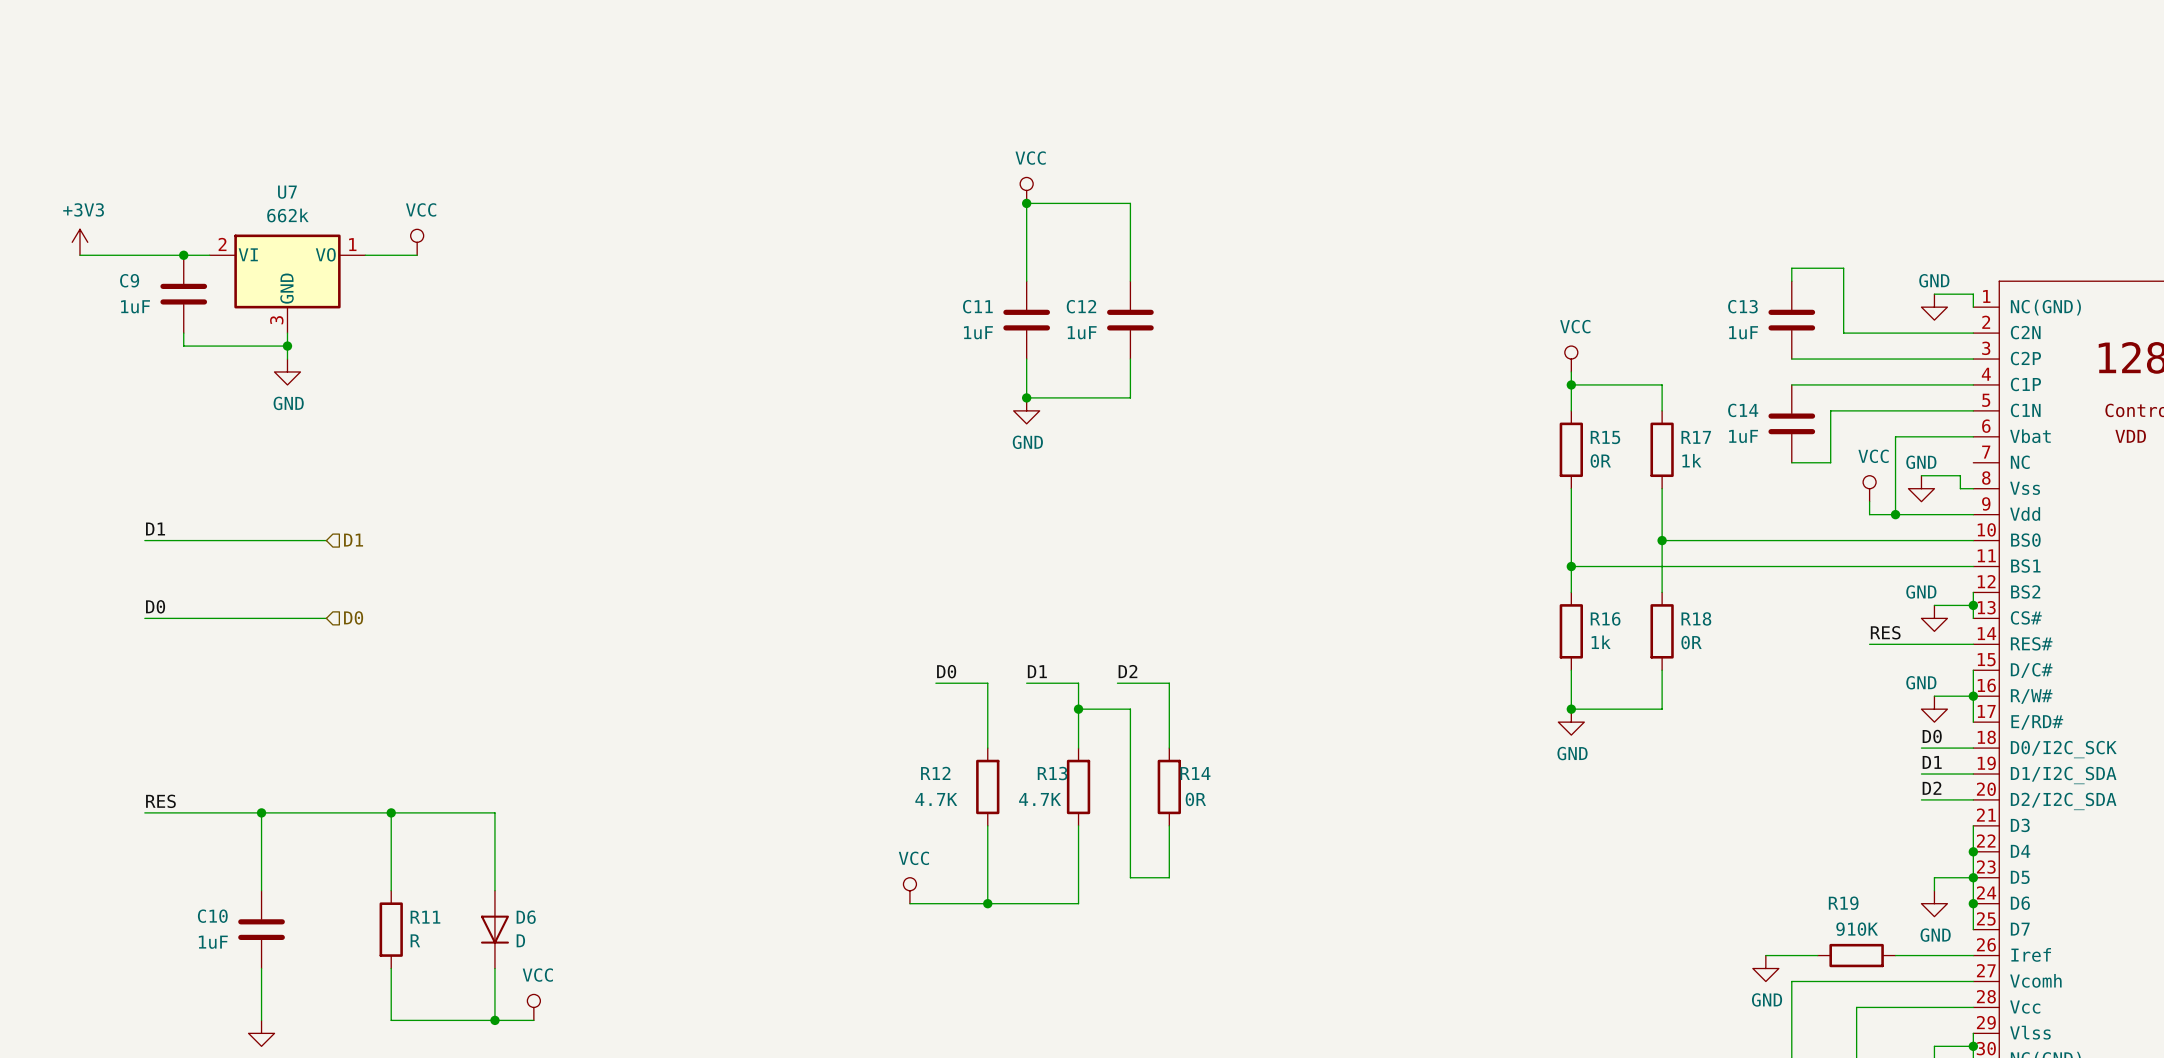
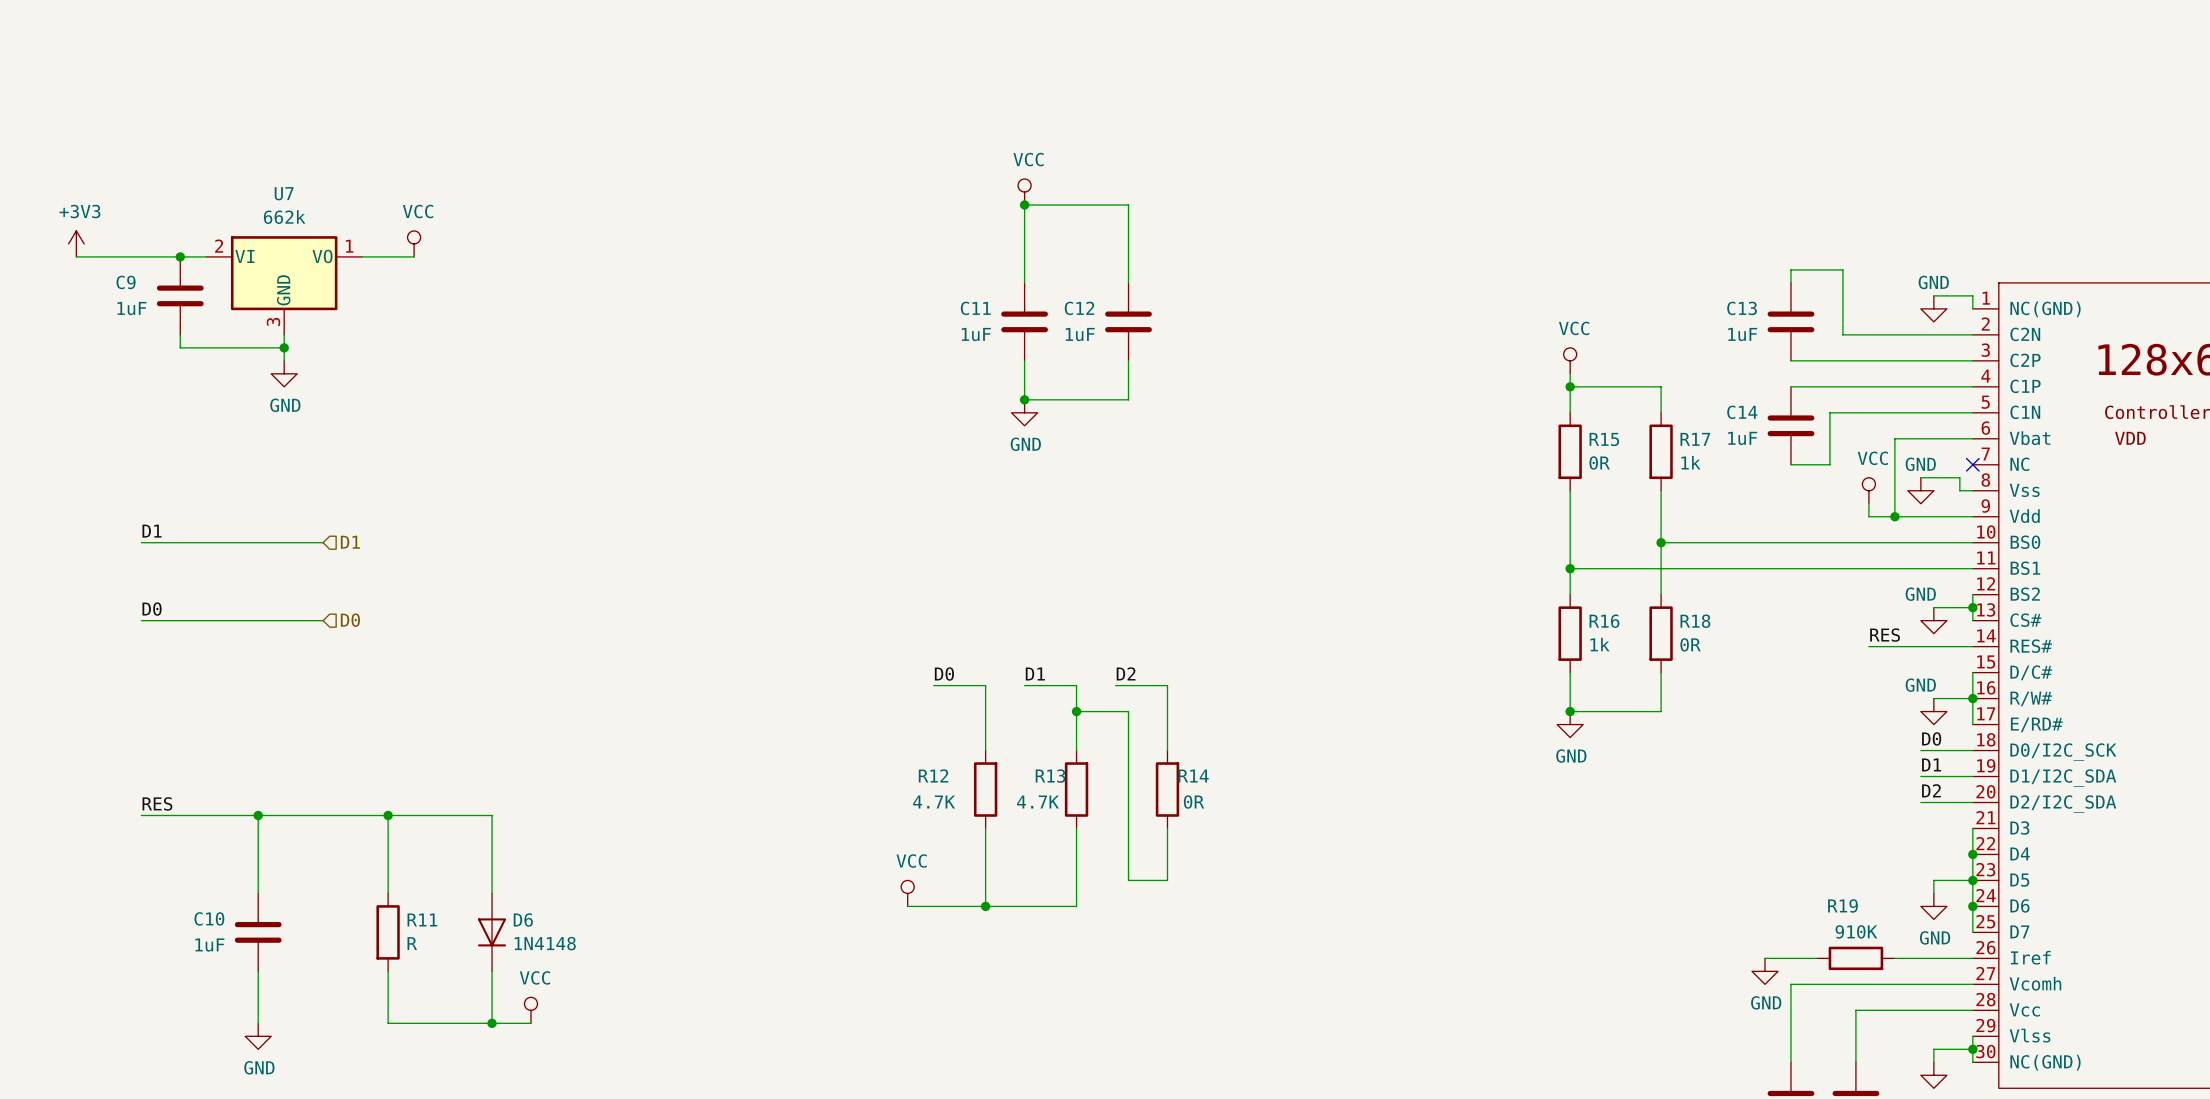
no-connect mark: none -> (1972, 464)
D6 value: D (520, 940) -> 1N4148 (545, 943)

